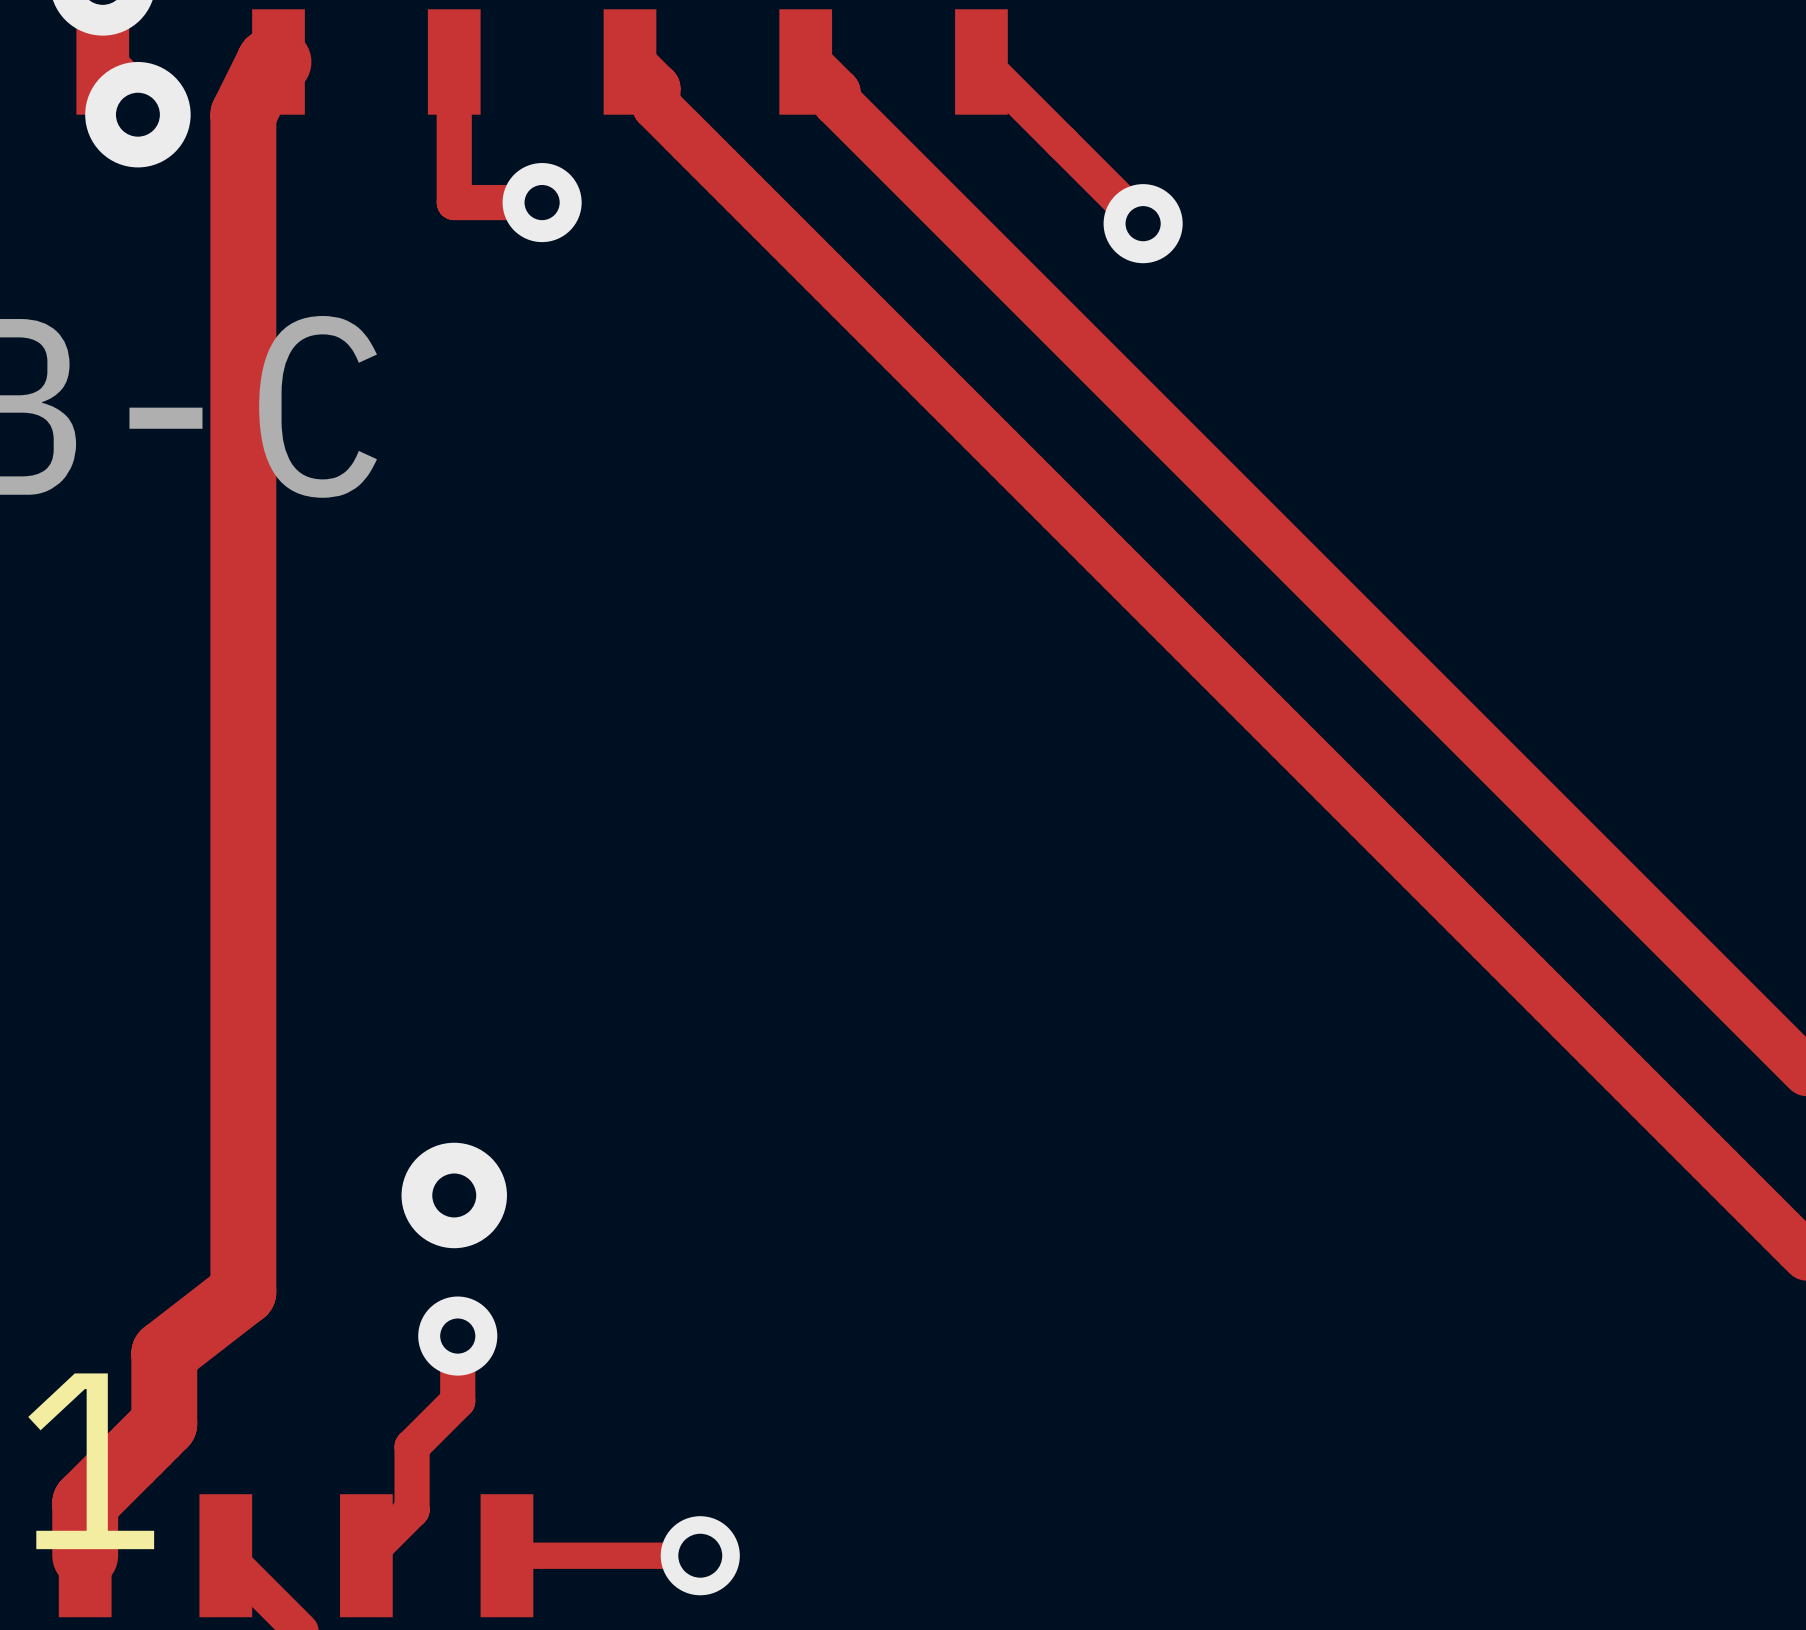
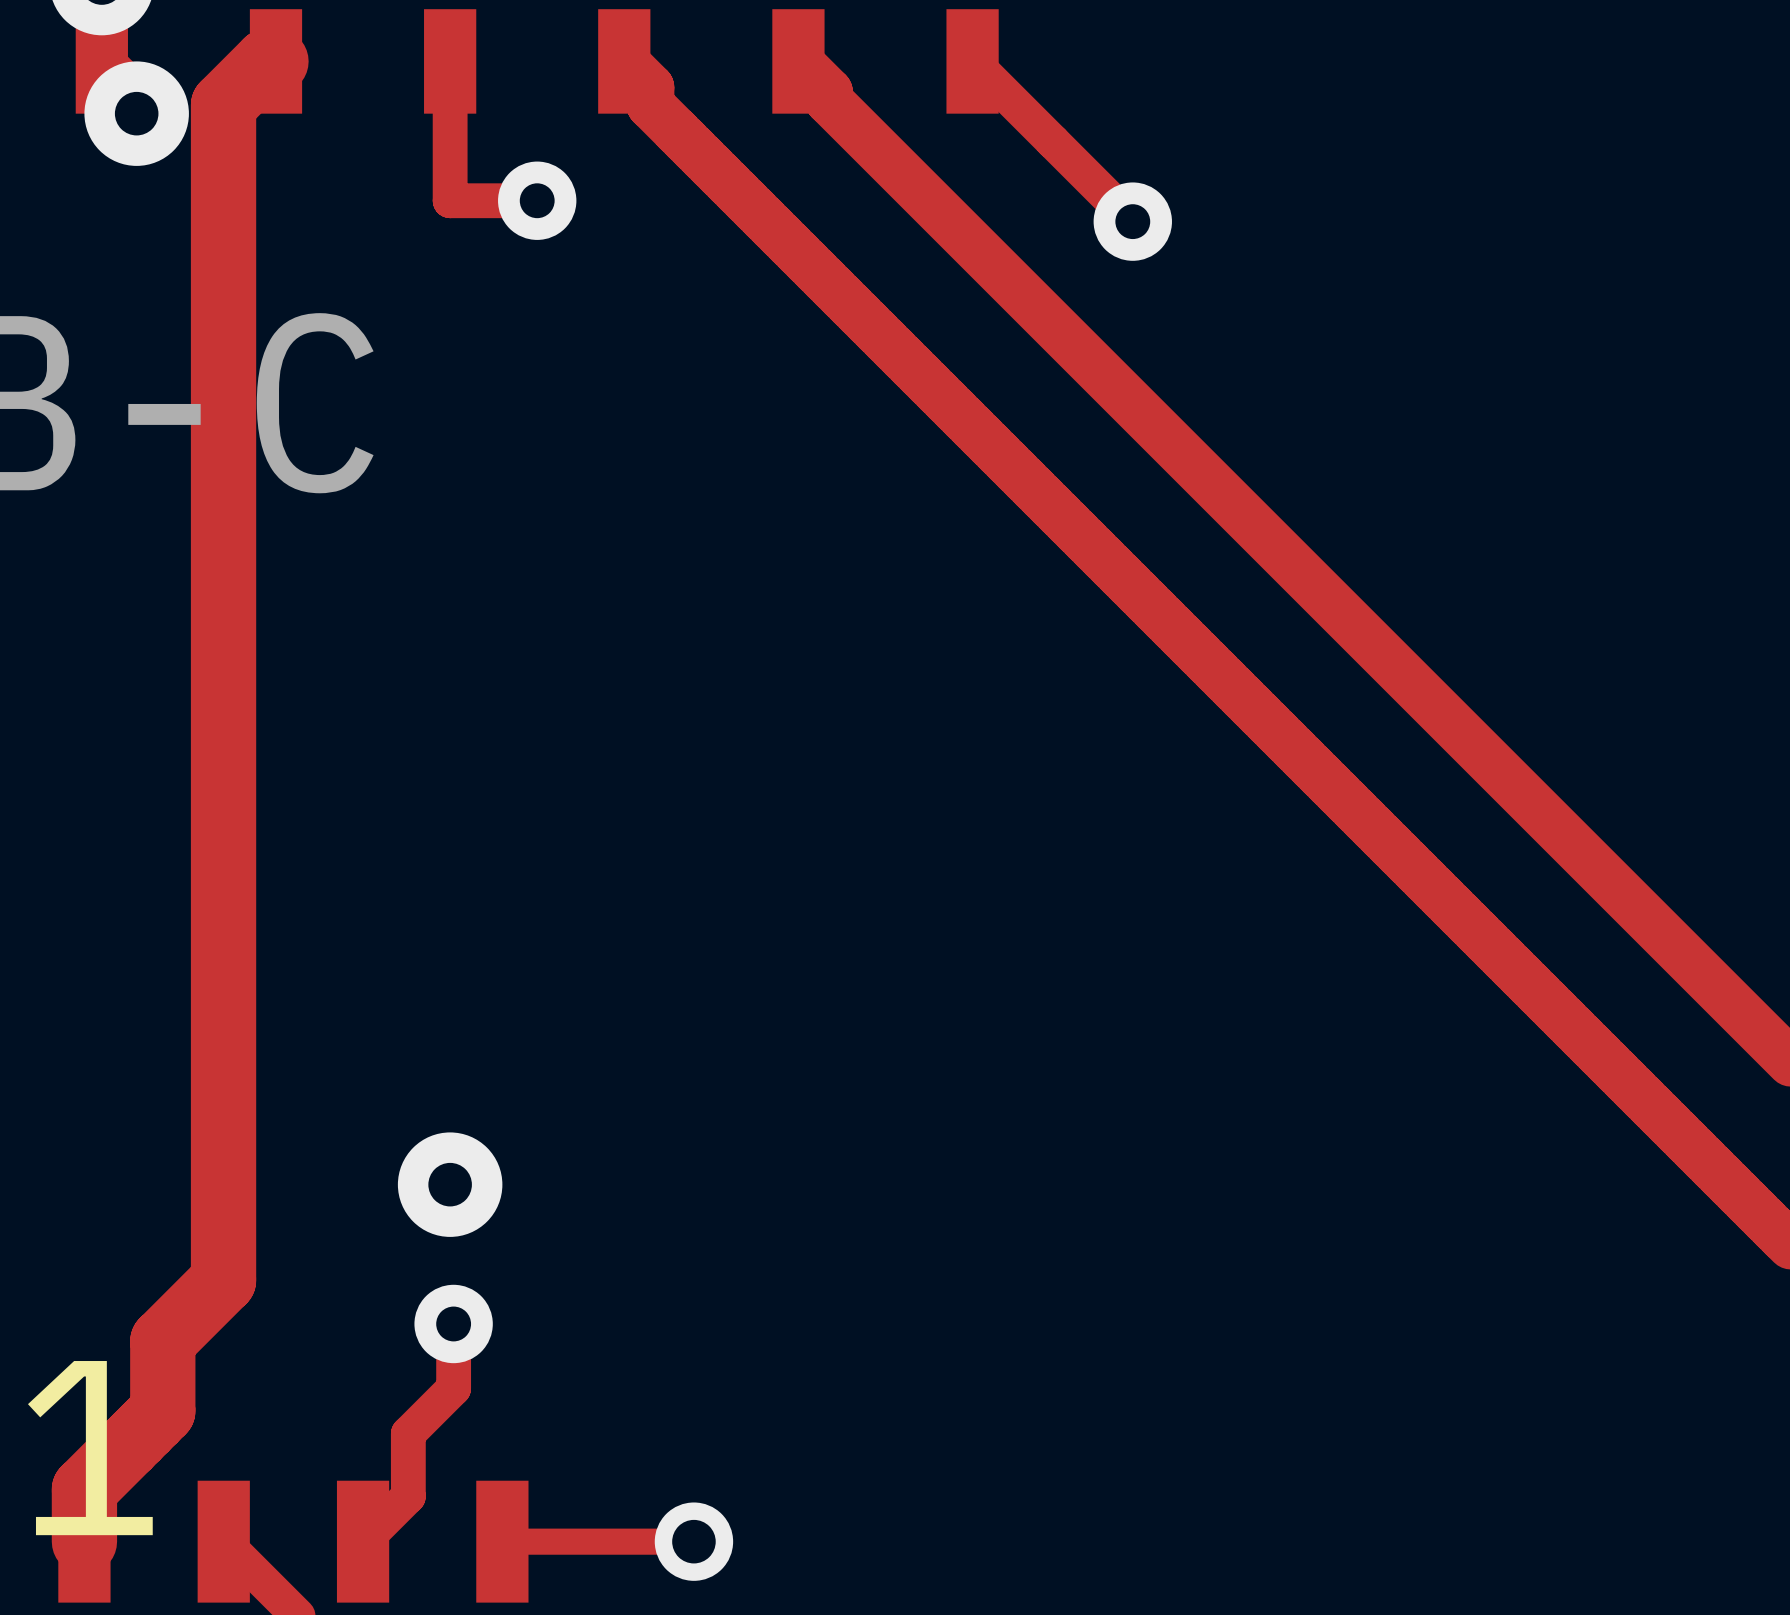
track: (269, 61) (243, 114) (243, 1292) (164, 1353) -> (267, 61) (223, 104) (223, 1280) (162, 1341)

